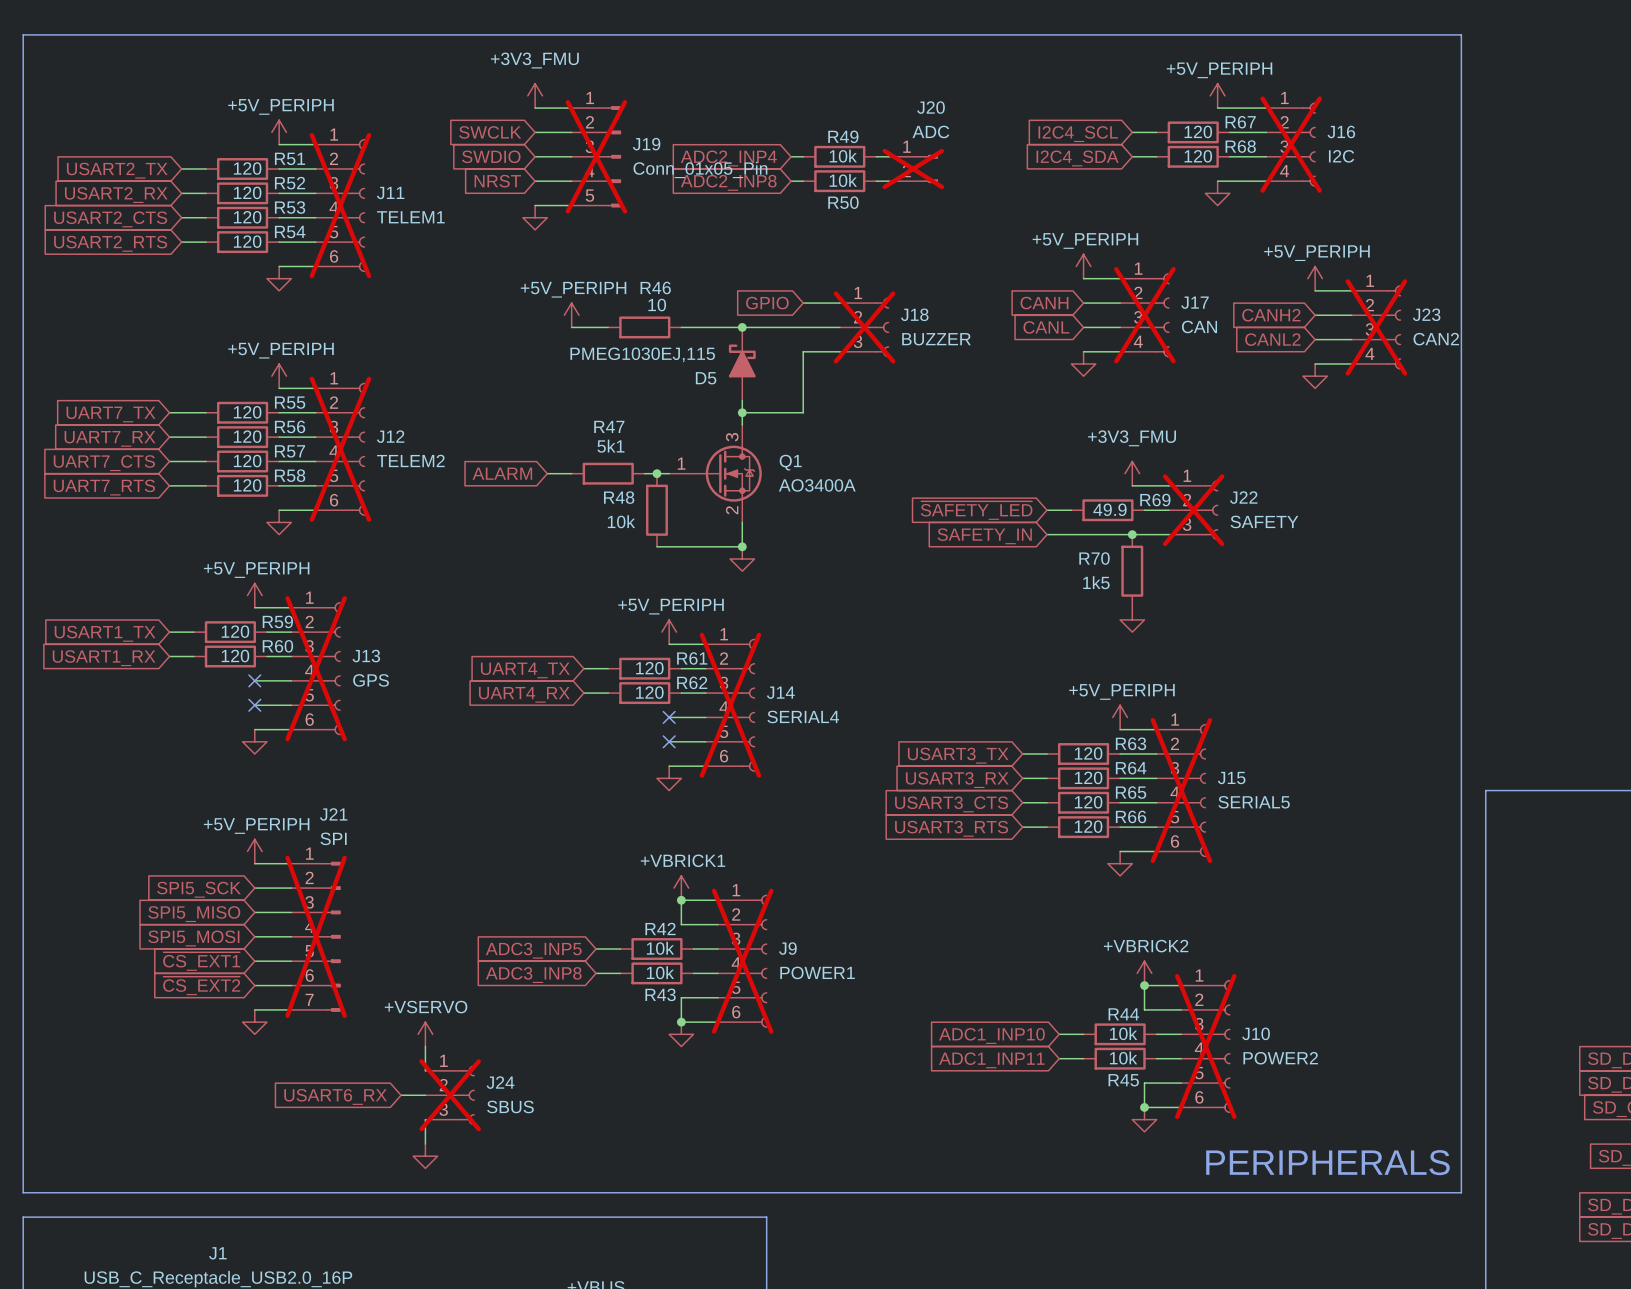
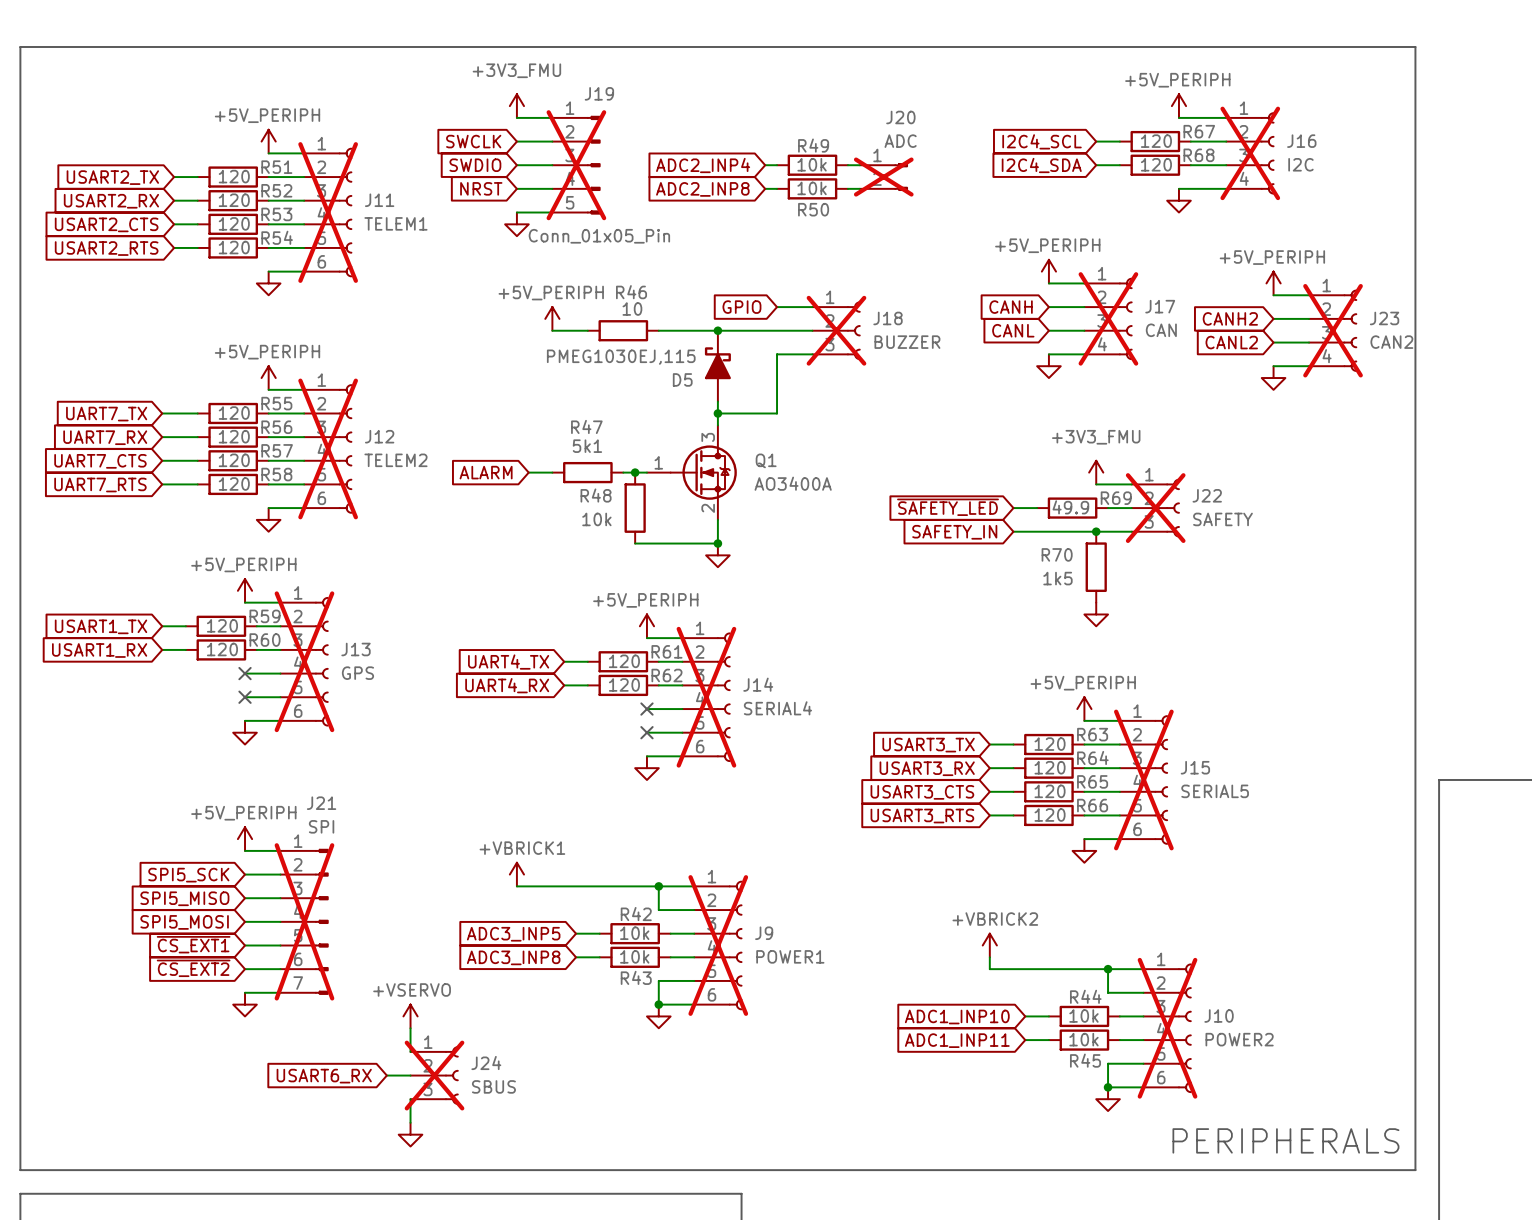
J19 name position: J19 (646, 144) -> J19 (599, 93)
J19 value position: Conn_01x05_Pin (700, 169) -> Conn_01x05_Pin (599, 236)
power symbol position: +VBRICK1 (681, 888) -> +VBRICK1 (516, 874)
wire: none -> (516, 886) (658, 886)
wire: none -> (989, 957) (989, 969) (1108, 969)
power symbol position: +VBRICK2 (1144, 973) -> +VBRICK2 (989, 945)

